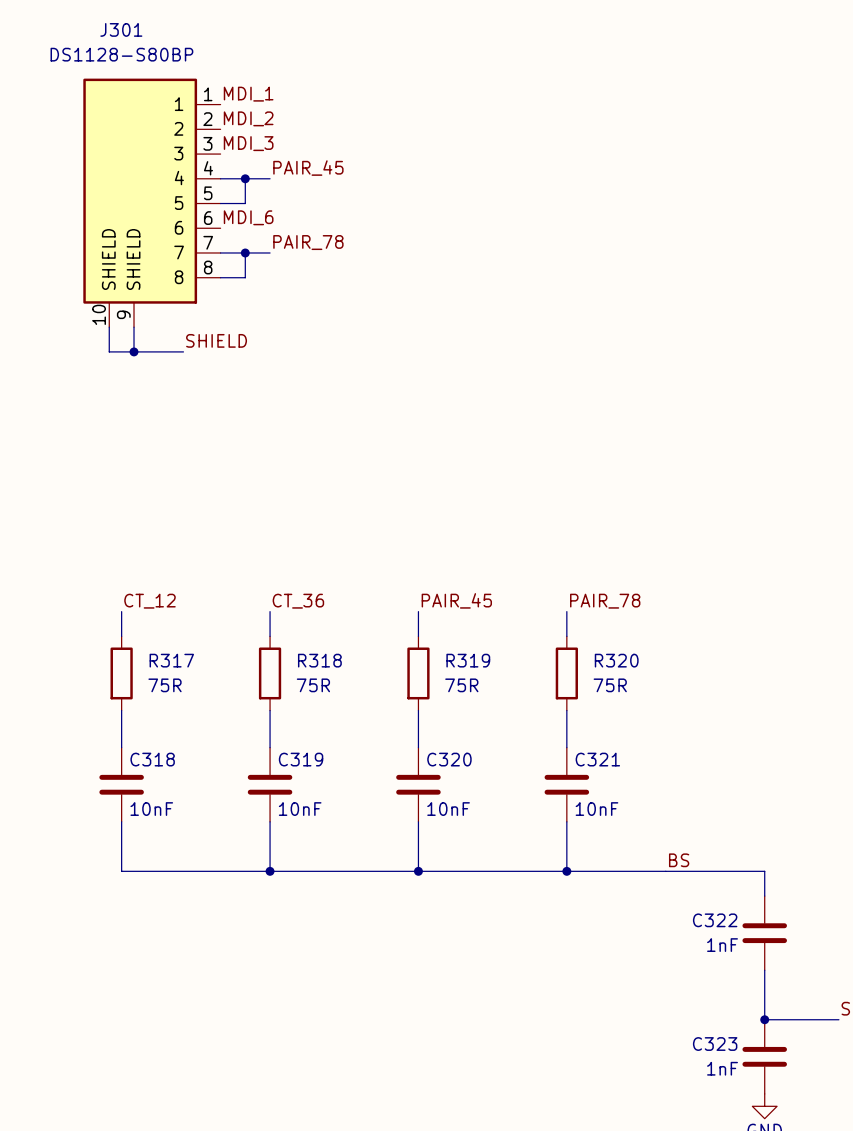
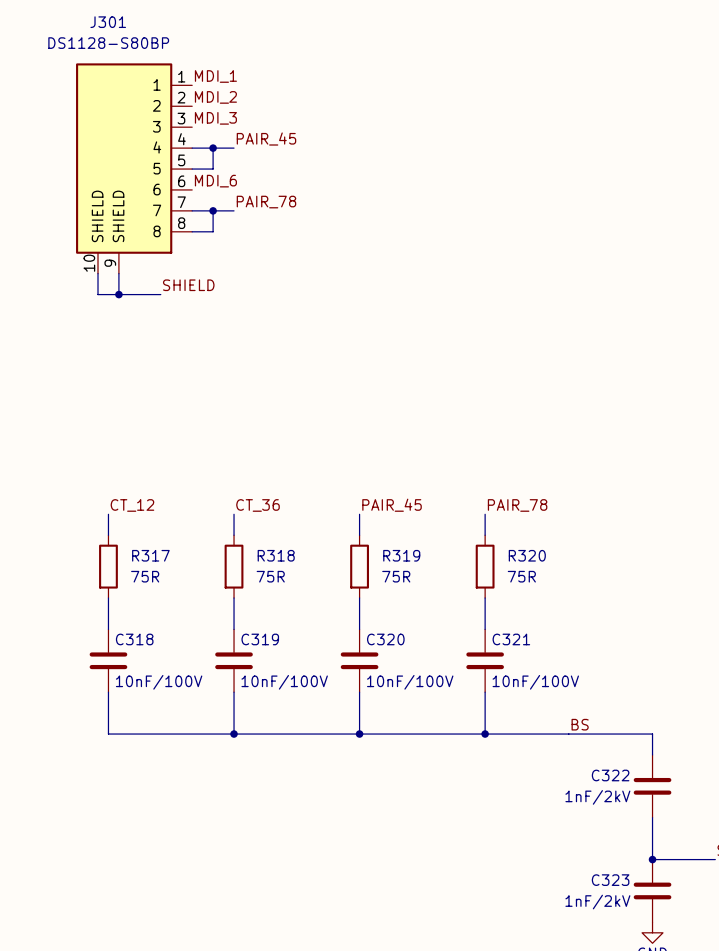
C318 value: 10nF (151, 809) -> 10nF/100V (159, 682)
C319 value: 10nF (300, 809) -> 10nF/100V (284, 682)
C320 value: 10nF (448, 809) -> 10nF/100V (410, 682)
C321 value: 10nF (596, 809) -> 10nF/100V (535, 682)
C322 value: 1nF (722, 945) -> 1nF/2kV (597, 797)
C323 value: 1nF (722, 1068) -> 1nF/2kV (597, 902)

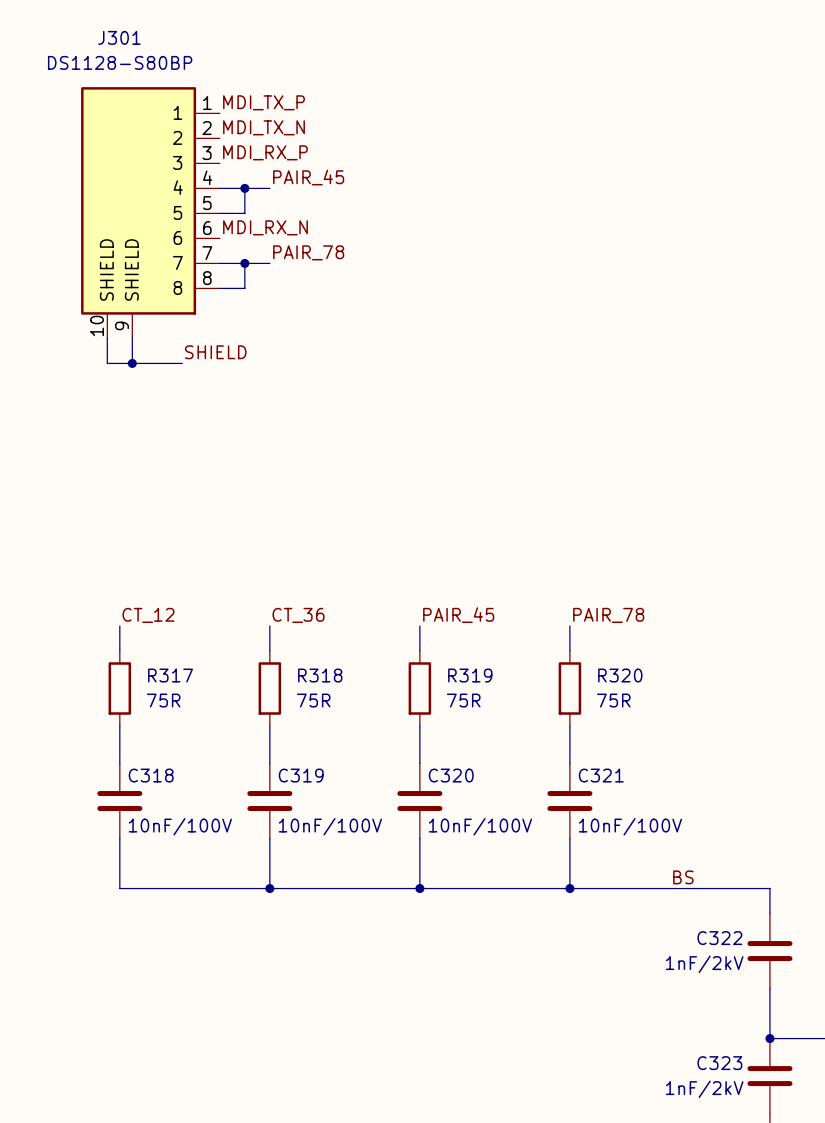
label: MDI_1 (215, 76) -> MDI_TX_P (263, 102)
label: MDI_2 (215, 97) -> MDI_TX_N (263, 127)
label: MDI_3 (215, 118) -> MDI_RX_P (265, 152)
label: MDI_6 (215, 181) -> MDI_RX_N (265, 227)

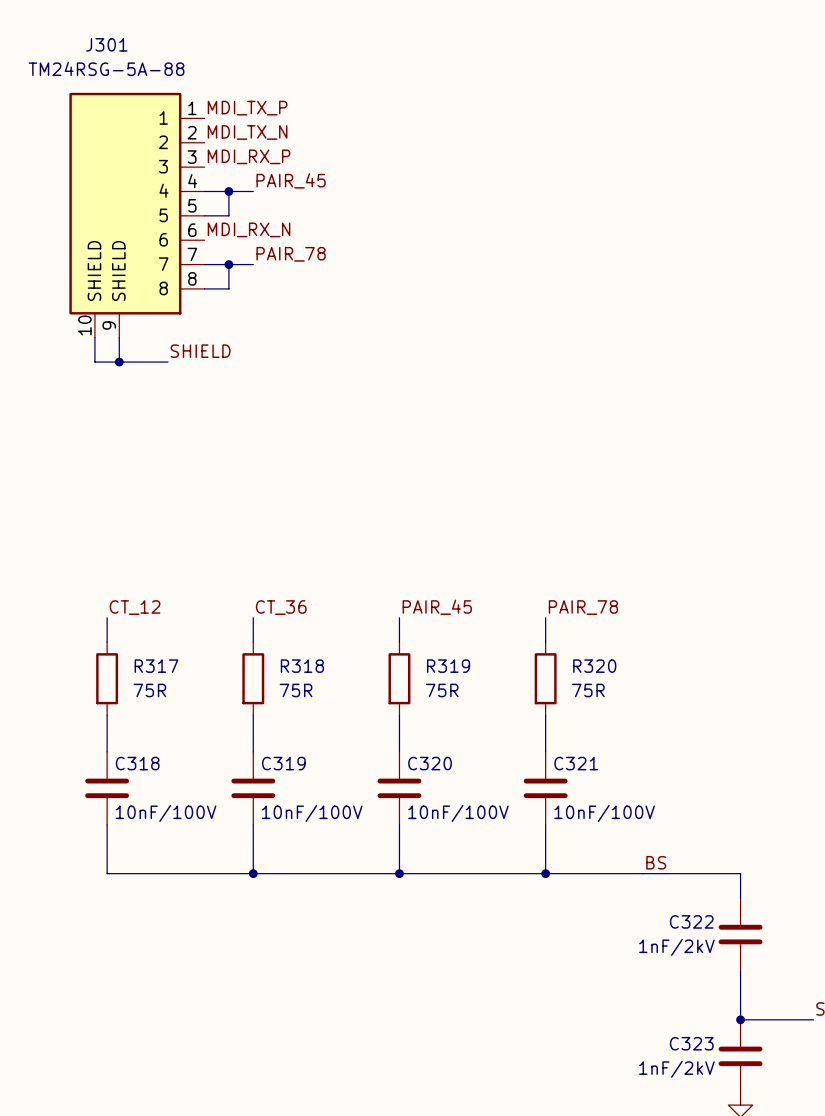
J301 value: DS1128-S80BP (120, 62) -> TM24RSG-5A-88 (106, 68)

